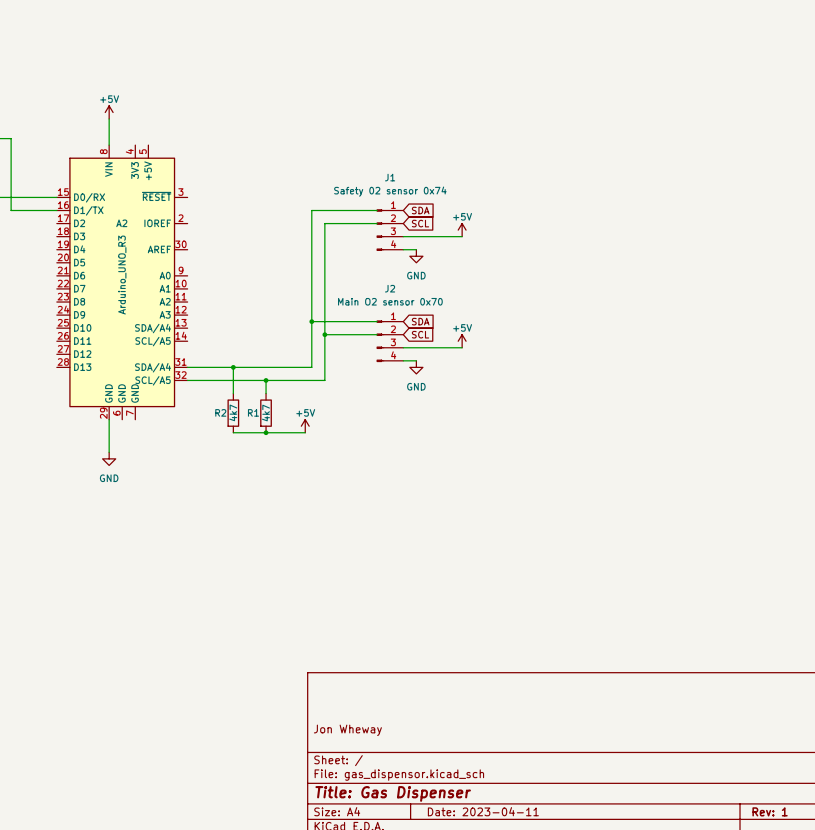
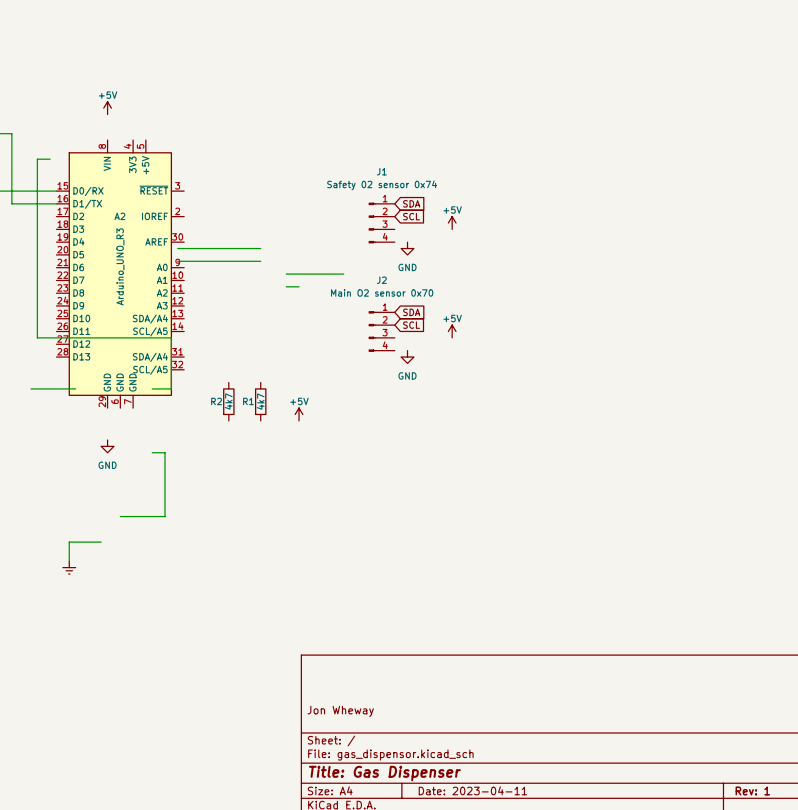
wire: (109, 118) (109, 145) -> none
wire: none -> (50, 159) (37, 159) (37, 337) (171, 337) (171, 388) (152, 388)
wire: (377, 210) (311, 210) (311, 367) (187, 367) -> none
wire: (377, 223) (324, 223) (324, 380) (187, 380) -> none
wire: (403, 236) (462, 236) -> (286, 274) (343, 274)
wire: (403, 249) (416, 249) -> (286, 286) (299, 286)
wire: none -> (177, 248) (260, 248)
wire: none -> (177, 261) (260, 261)
wire: (311, 321) (377, 321) -> none
junction: (311, 321) -> none
wire: (324, 334) (377, 334) -> none
junction: (324, 334) -> none
wire: (403, 347) (462, 347) -> none
wire: (403, 360) (416, 360) -> none
wire: (233, 367) (233, 393) -> none
junction: (233, 367) -> none
wire: (266, 380) (266, 393) -> none
junction: (266, 380) -> none
wire: none -> (30, 388) (75, 388)
wire: (109, 419) (109, 452) -> none
wire: (233, 432) (305, 432) -> none
junction: (266, 432) -> none
wire: none -> (152, 452) (165, 452) (165, 516) (120, 516)
wire: none -> (101, 542) (69, 542) (69, 561)
power symbol: none -> (69, 567)

